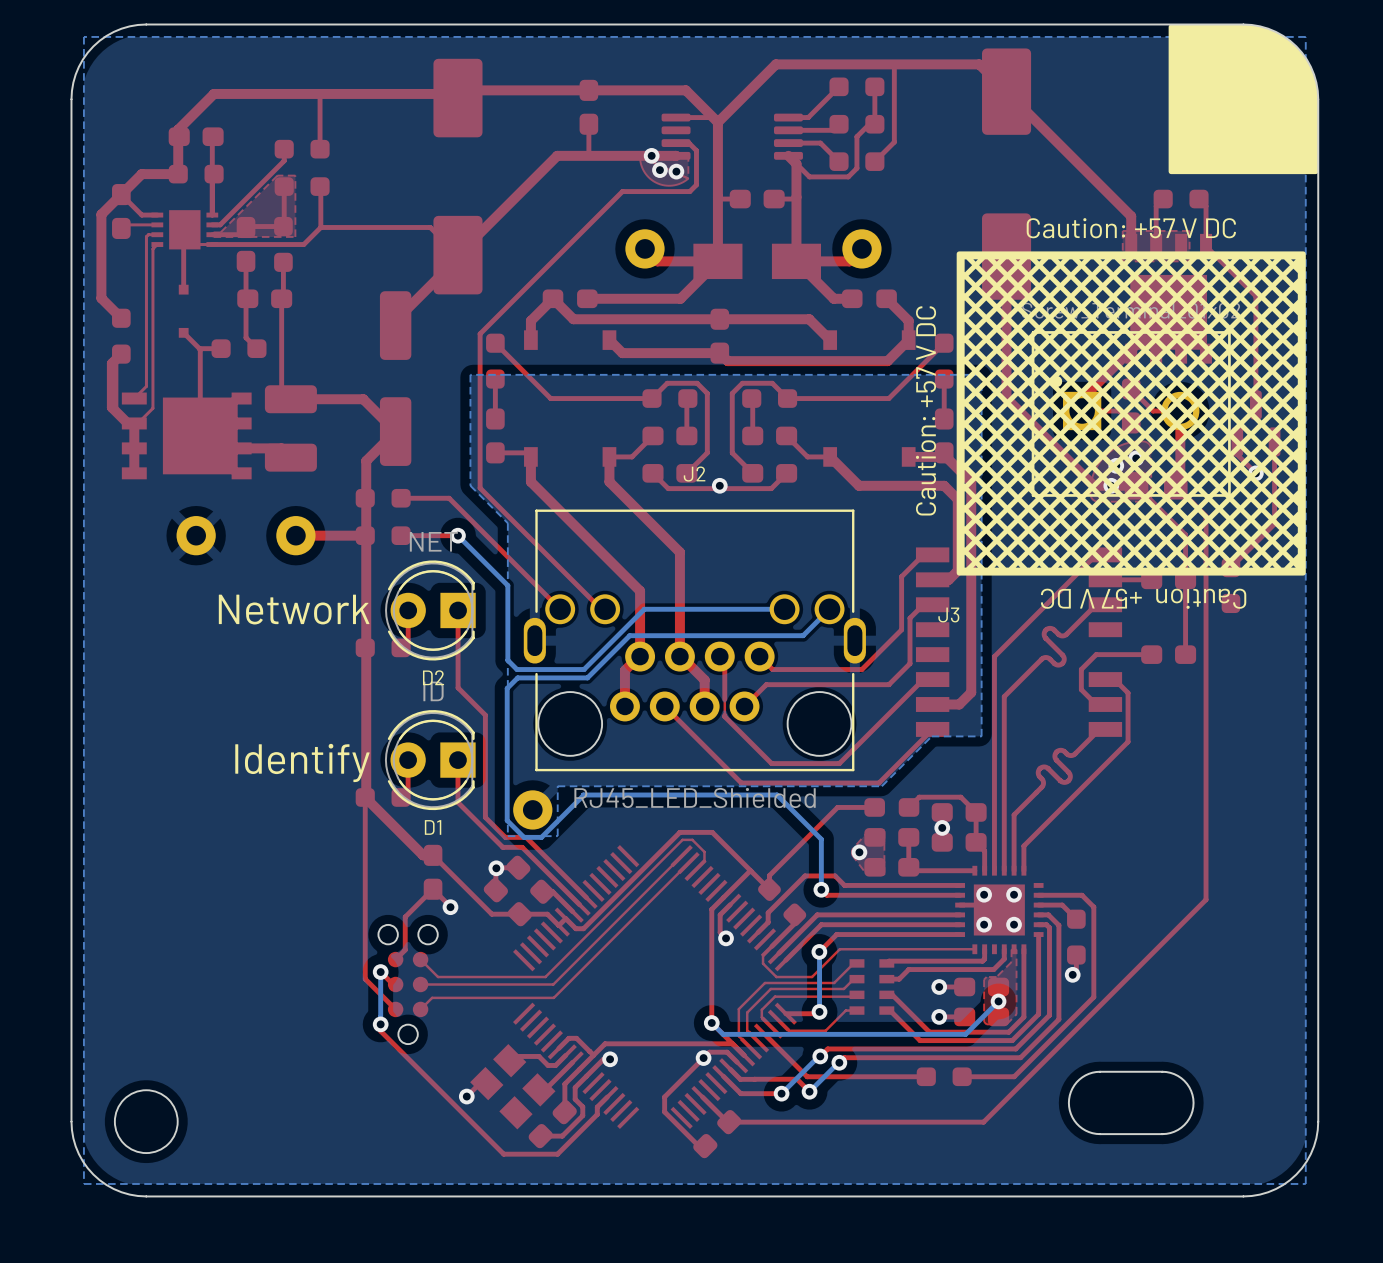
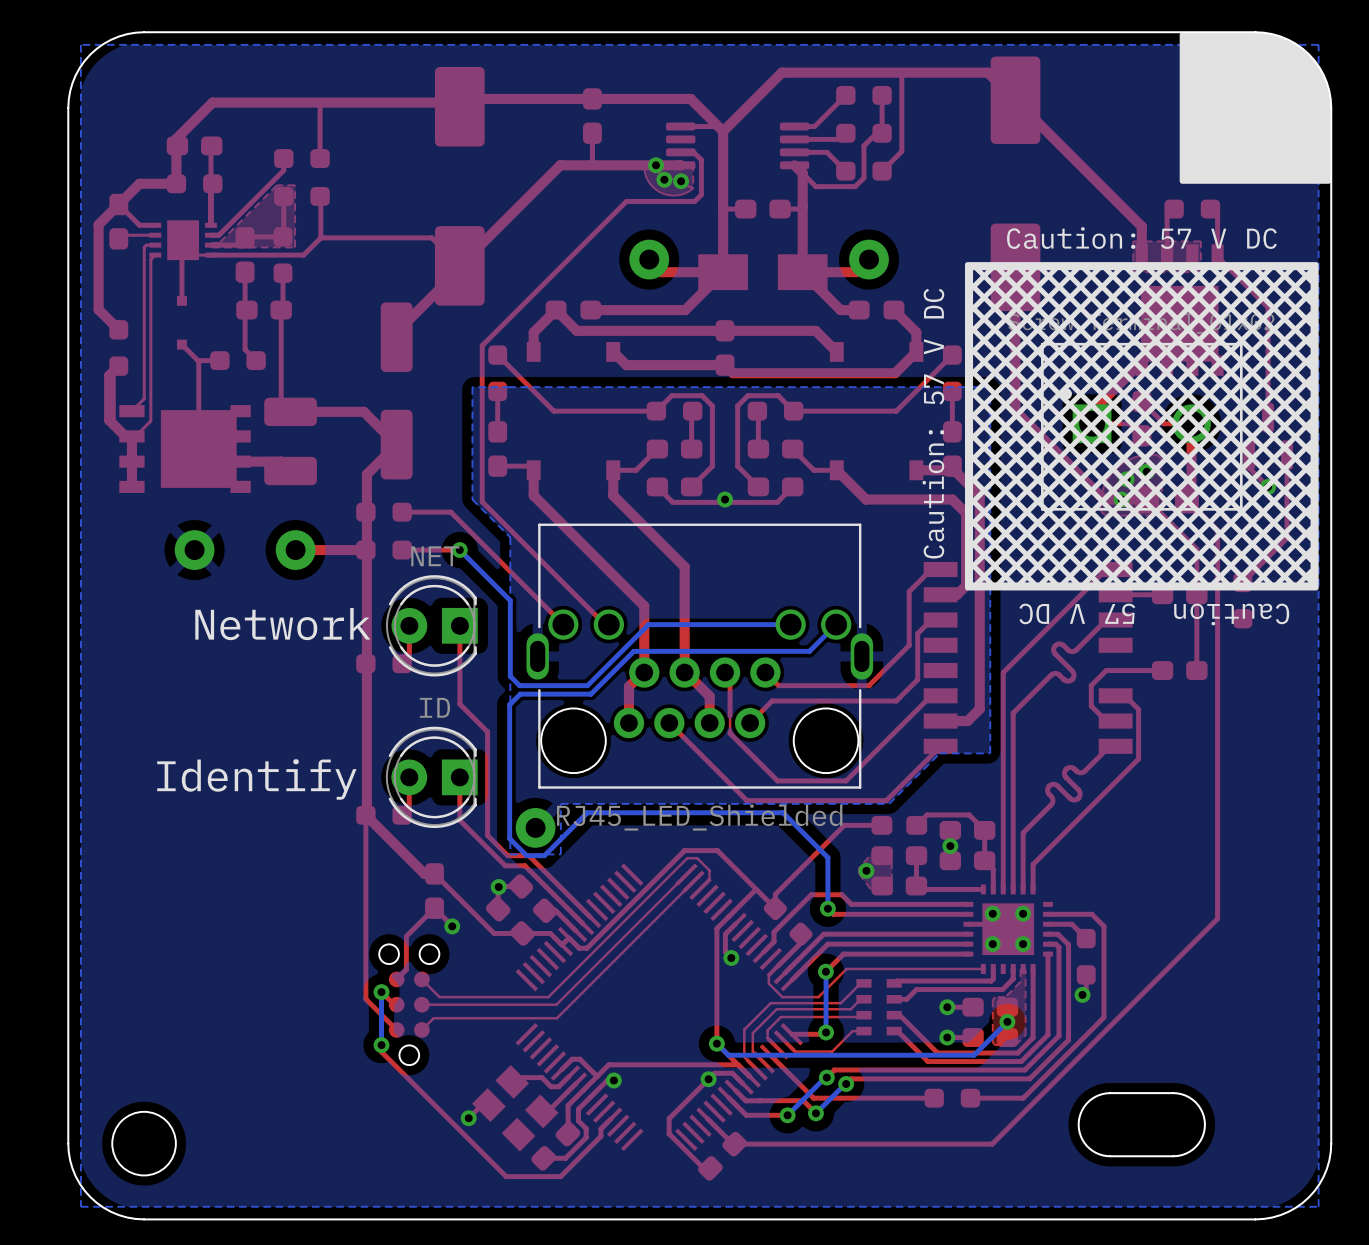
text: Caution: +57 V DC (1131, 228) -> Caution: 57 V DC (1141, 238)
text: Caution: +57 V DC (926, 410) -> Caution: 57 V DC (933, 423)
J2 name: J2 (694, 474) -> none
text: Caution +57 V DC (1143, 598) -> Caution 57 V DC (1154, 614)
J3 name: J3 (948, 614) -> none
D2 name: D2 (433, 677) -> none
text position: Identify (302, 762) -> Identify (256, 779)
D1 name: D1 (433, 827) -> none

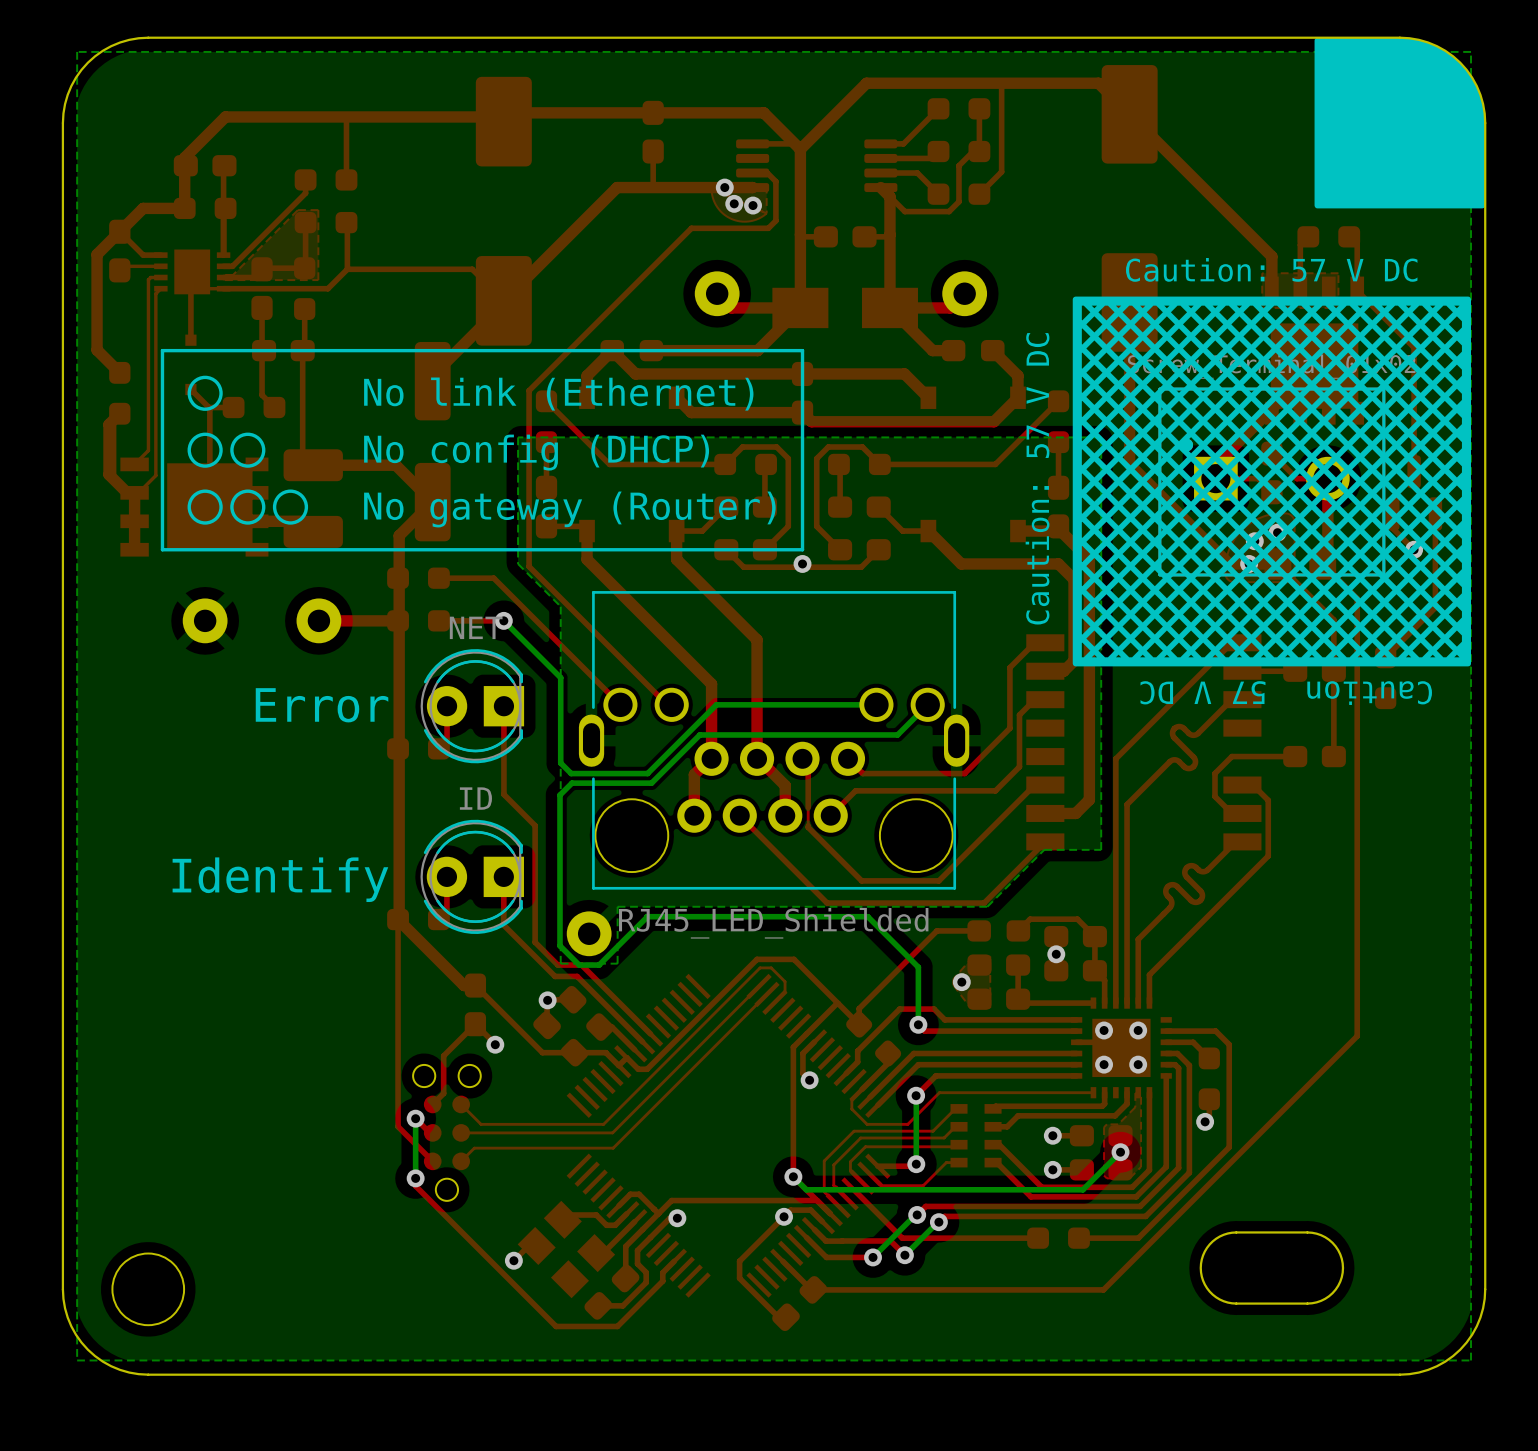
line: none -> (802, 350) (162, 350) (162, 549) (802, 549) (802, 350)
drawing: none -> [187, 375, 309, 525]
text: none -> No link (Ethernet) (558, 394)
text: none -> No config (DHCP) (536, 452)
text: none -> No gateway (Router) (569, 509)
text: Network (282, 624) -> Error (322, 705)

